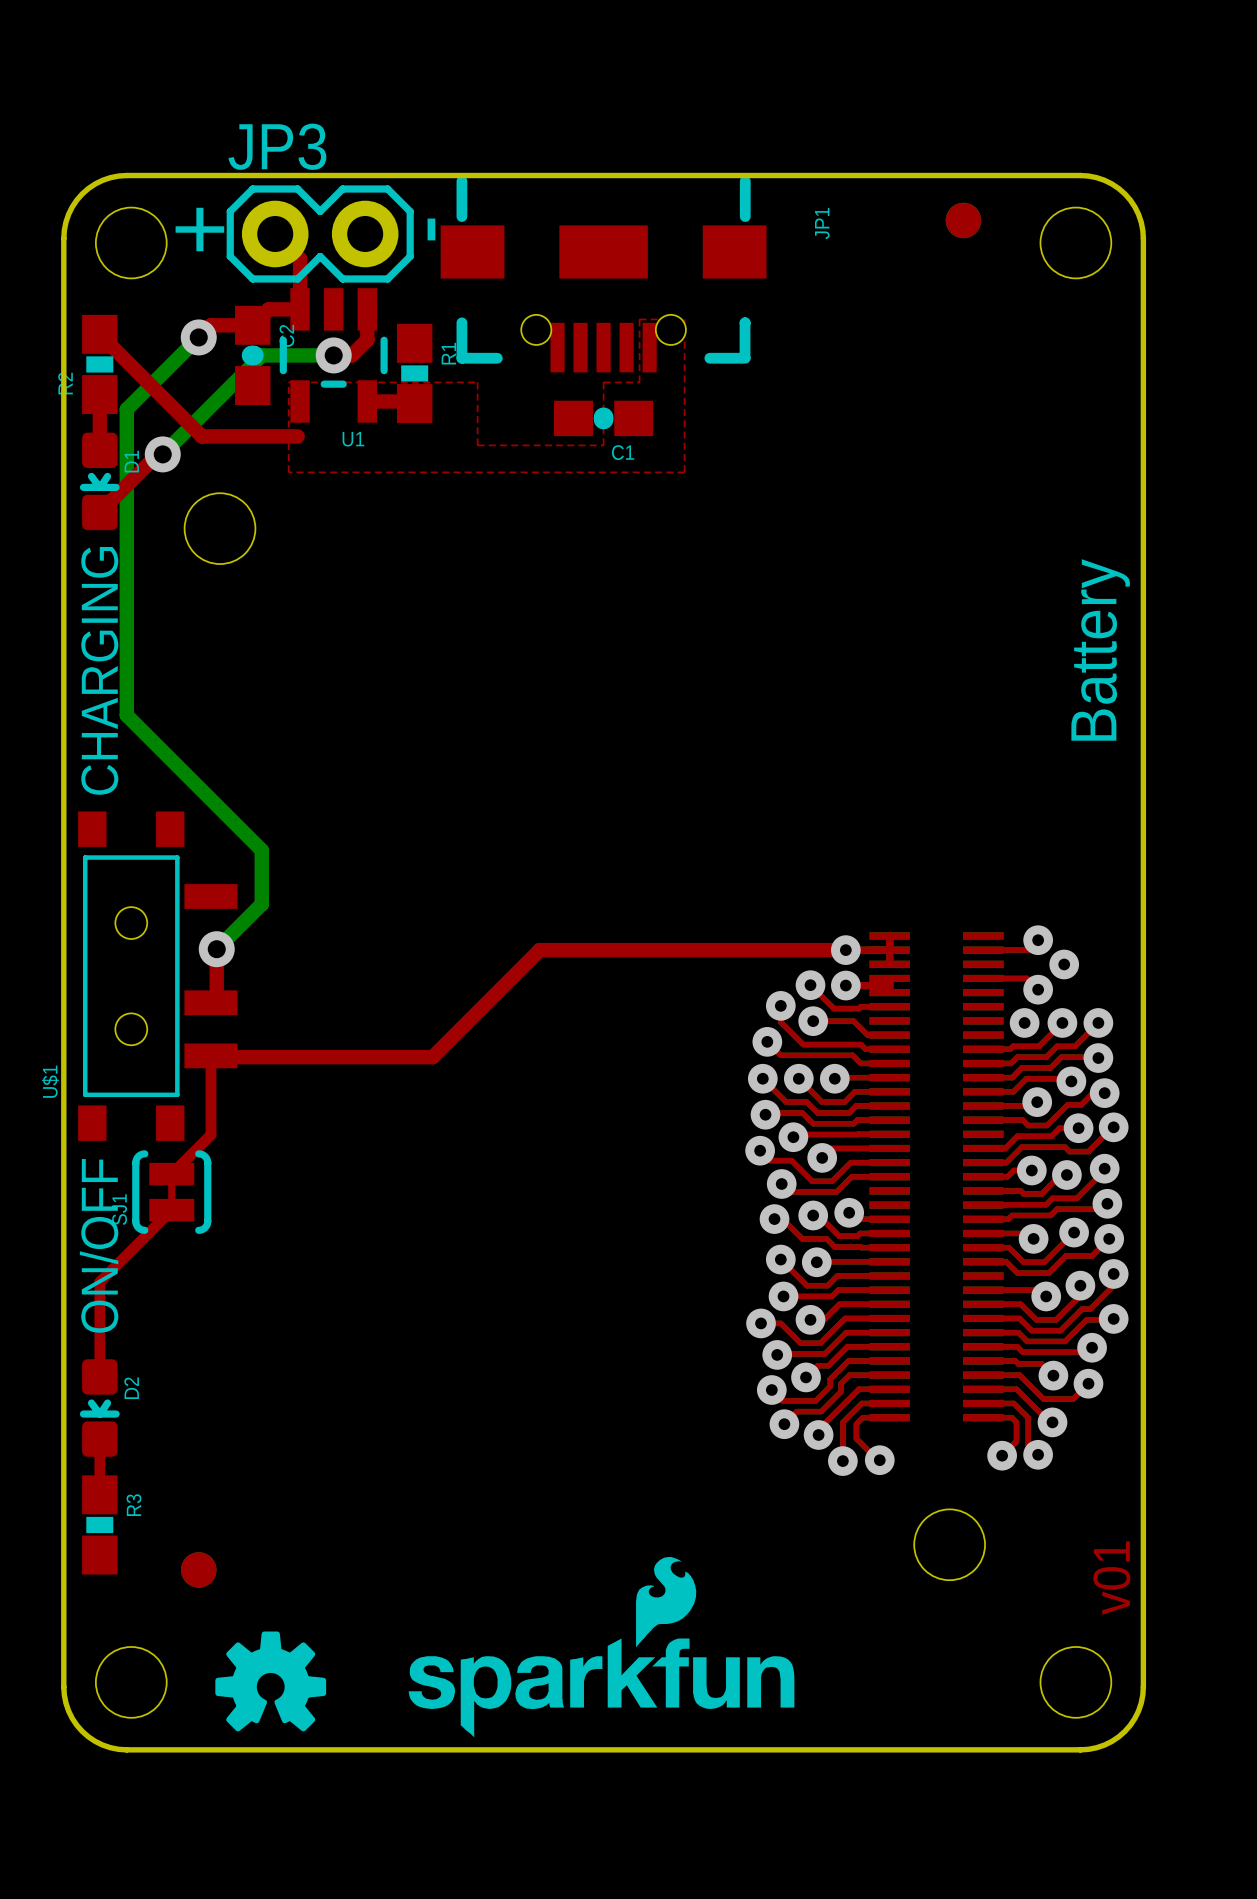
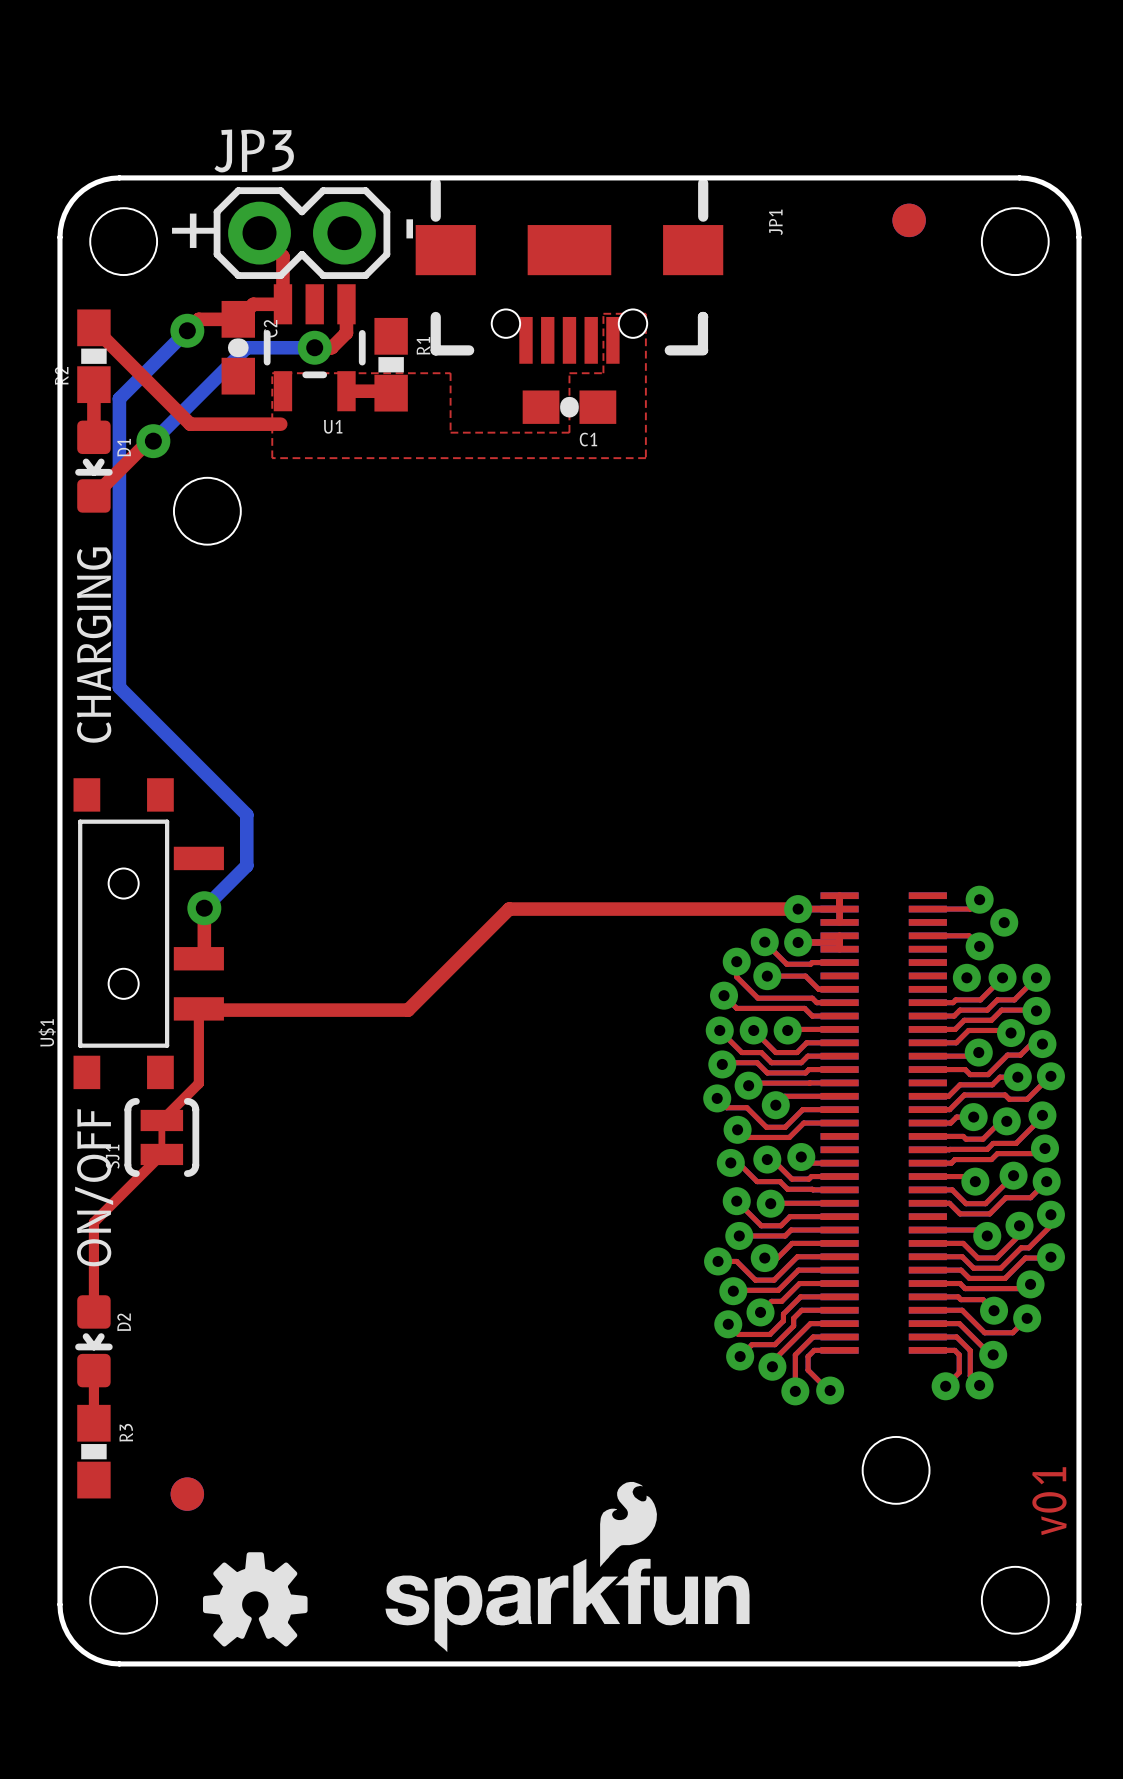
text: Battery (1100, 649) -> none

